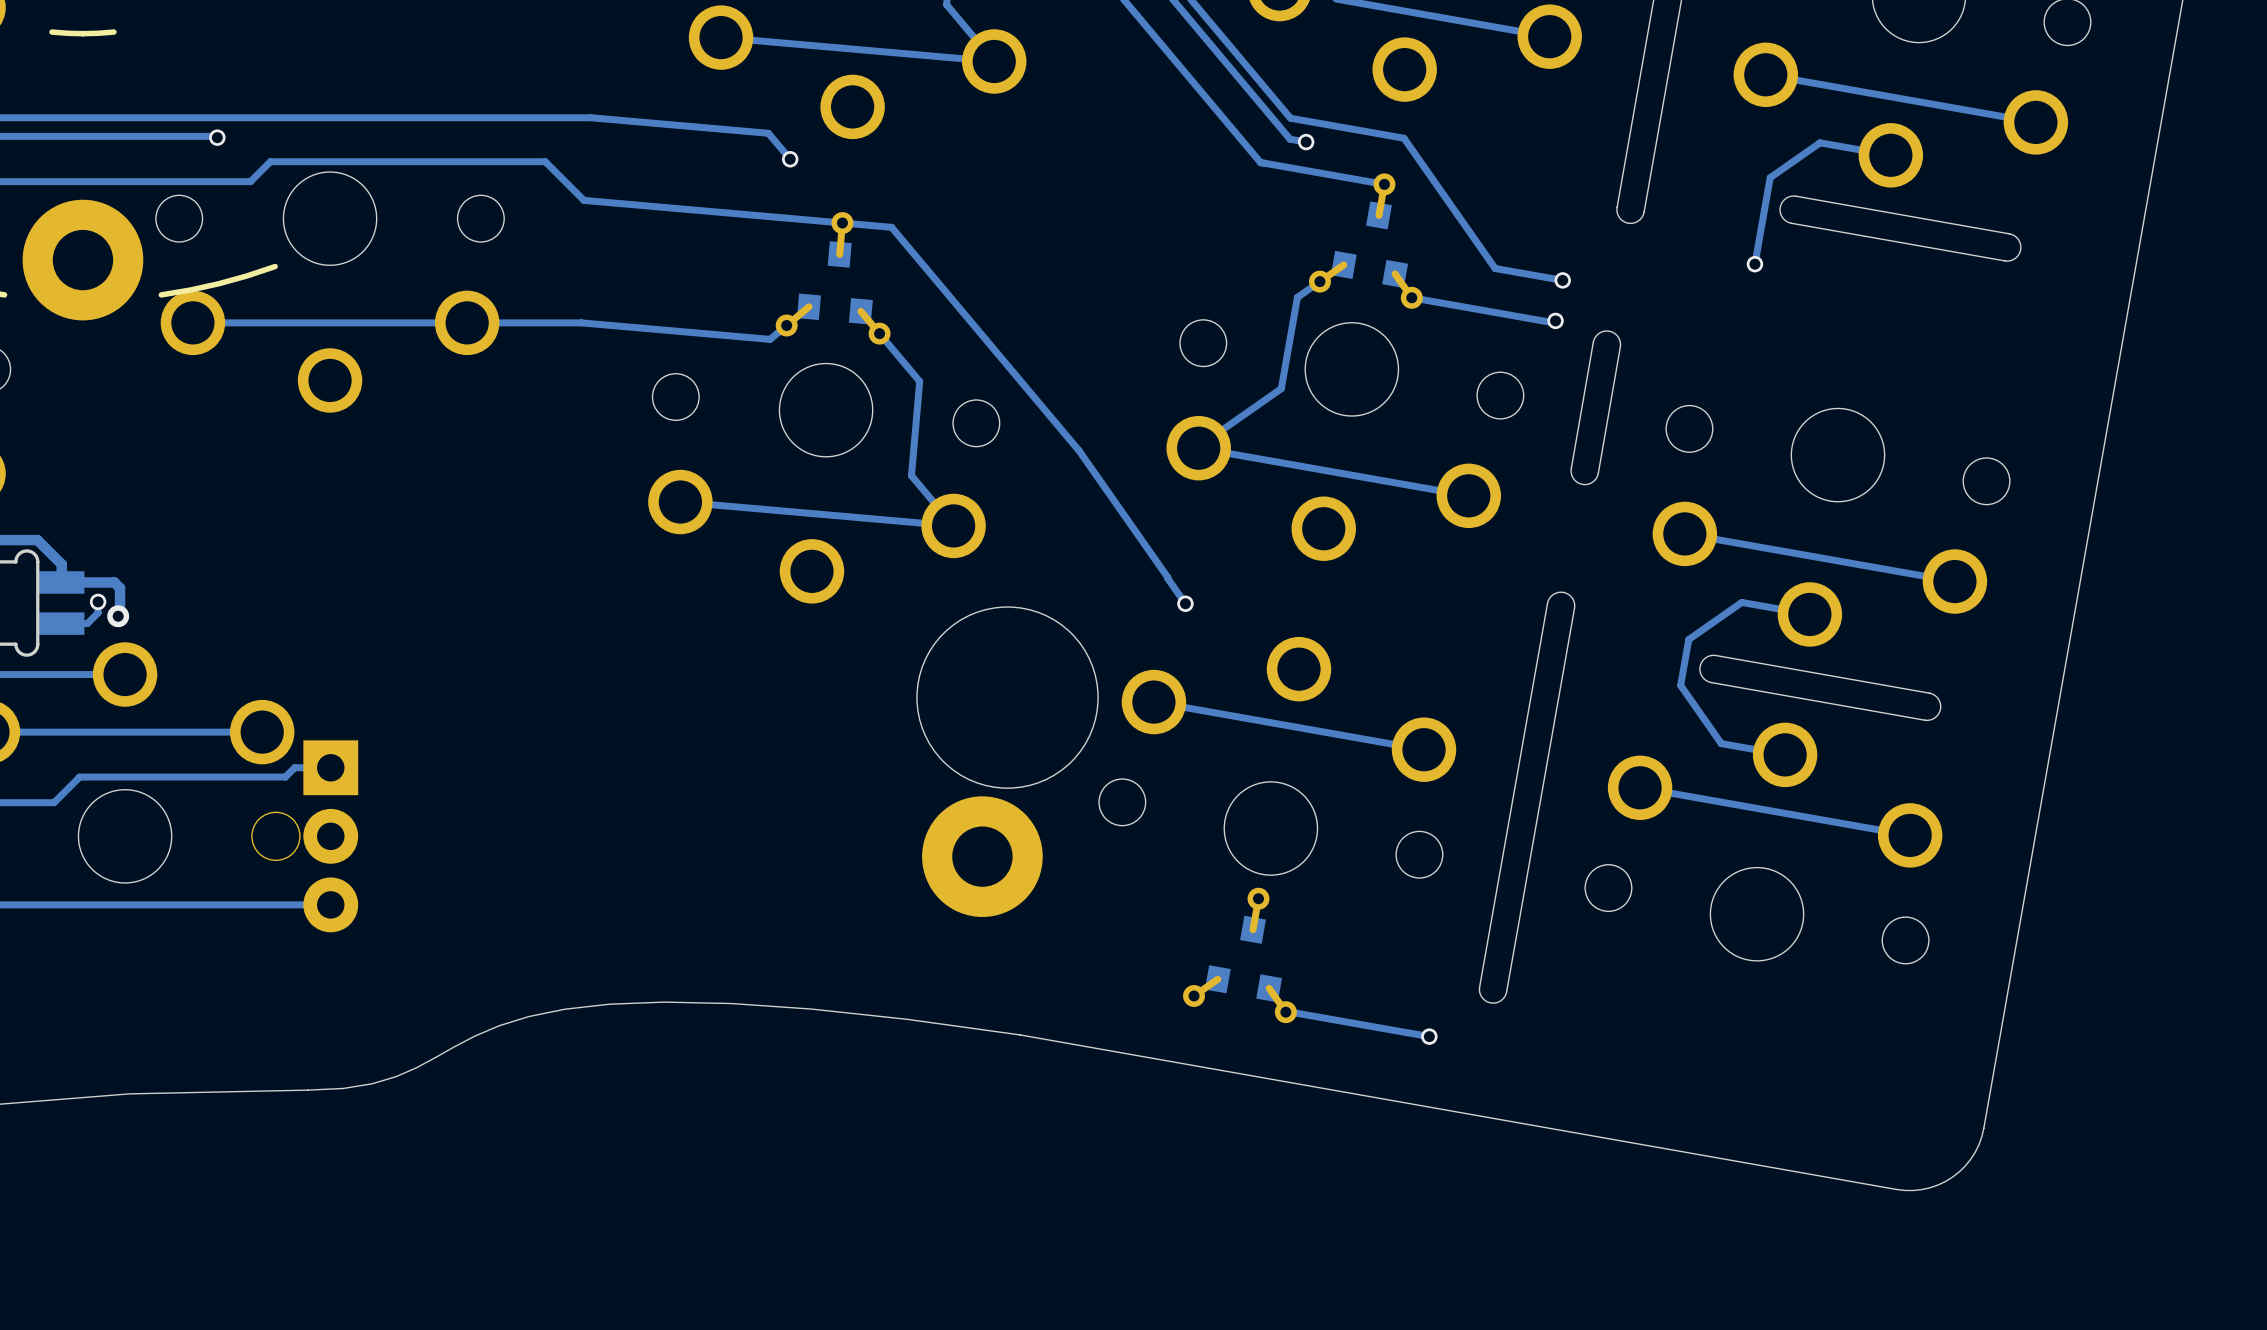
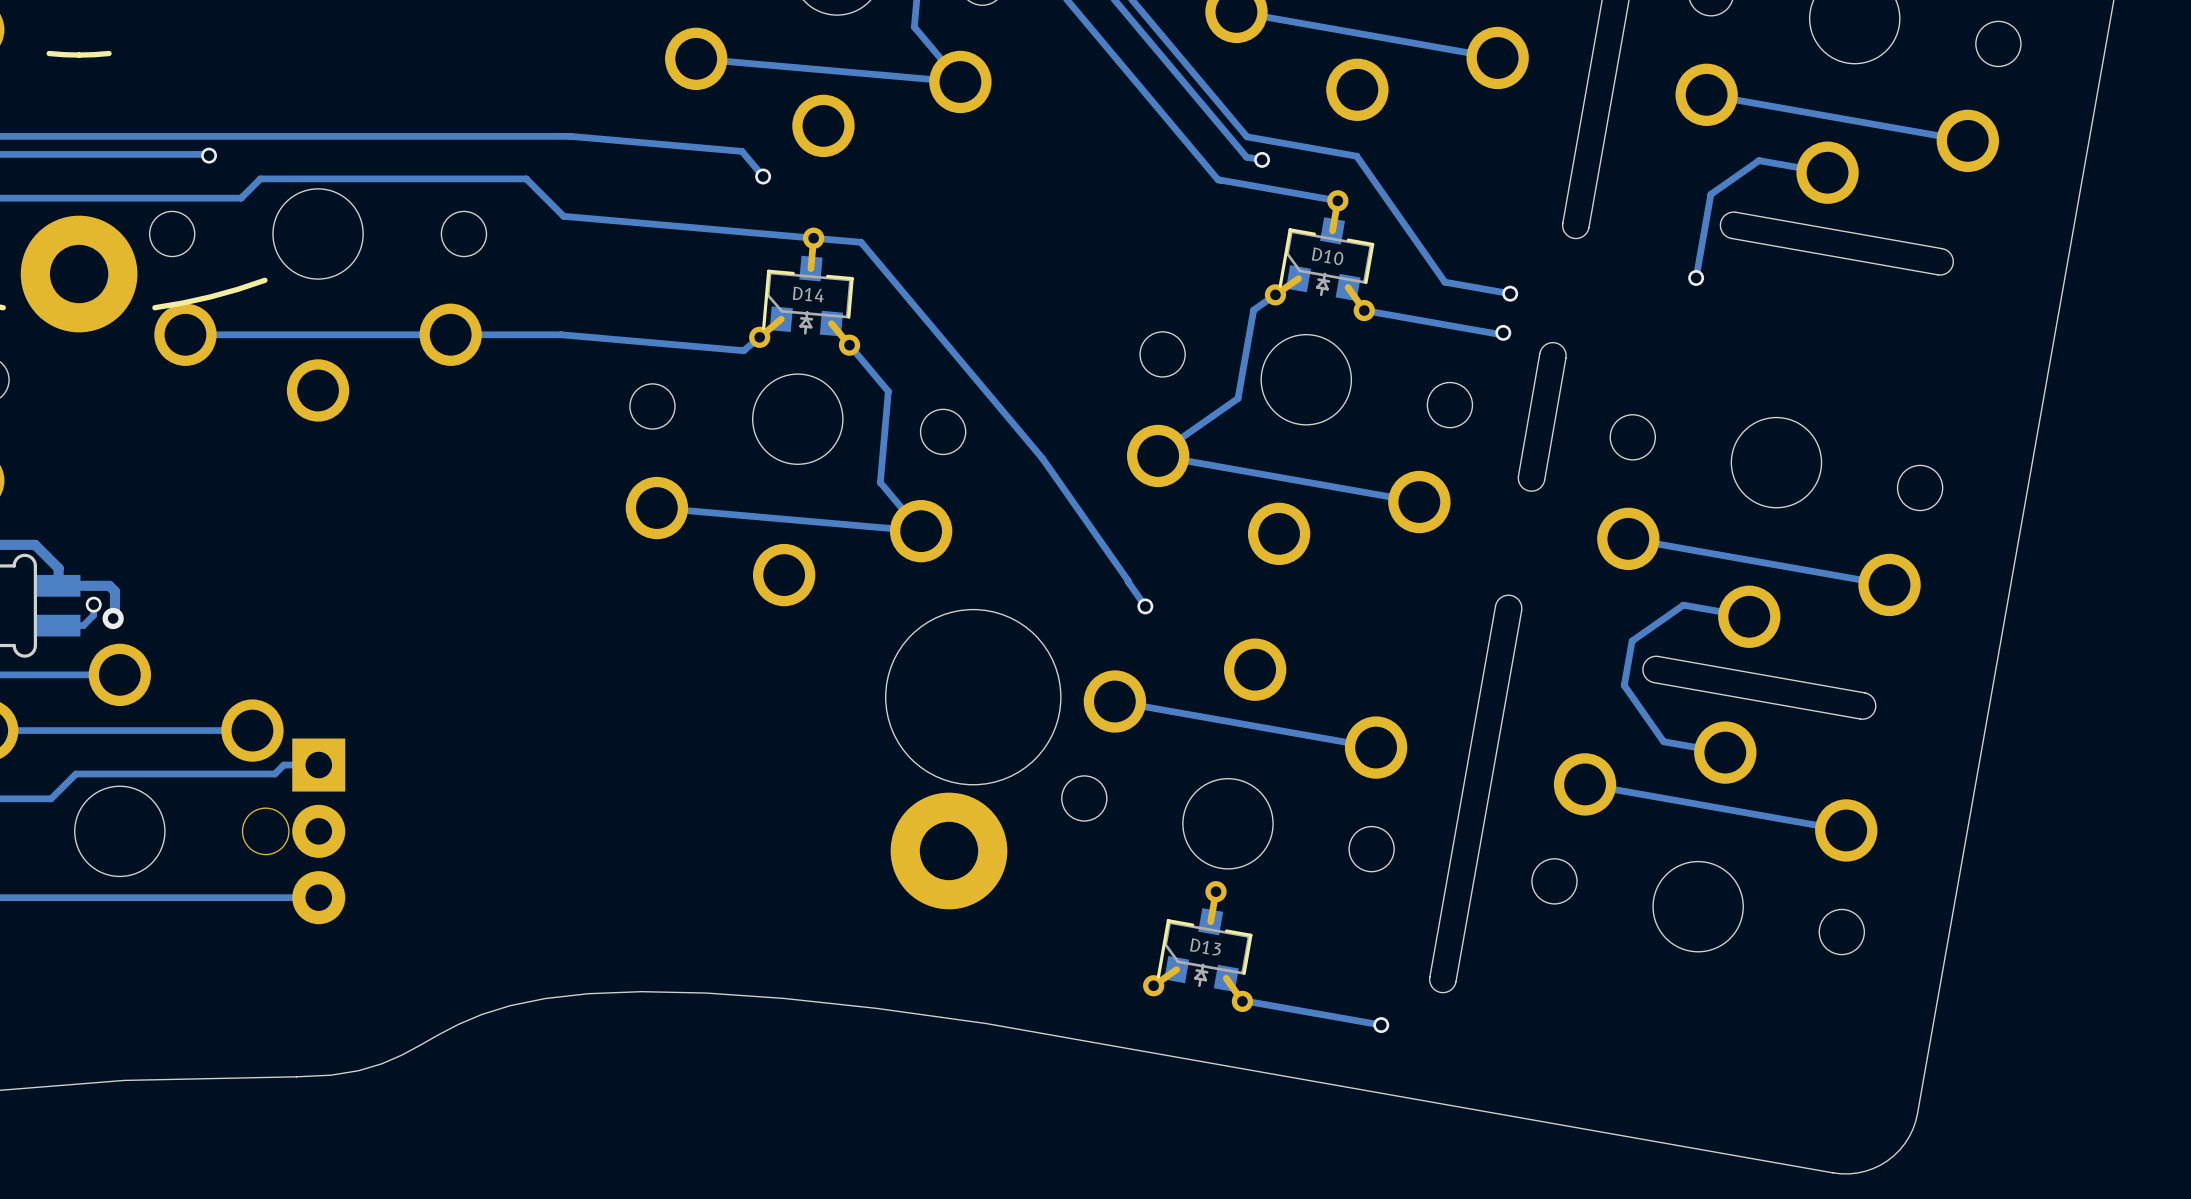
part: (1365, 241) -> none
D10: none -> (1319, 255)
part: (833, 278) -> none
D14: none -> (804, 291)
part: (1239, 955) -> none
D13: none -> (1198, 946)

